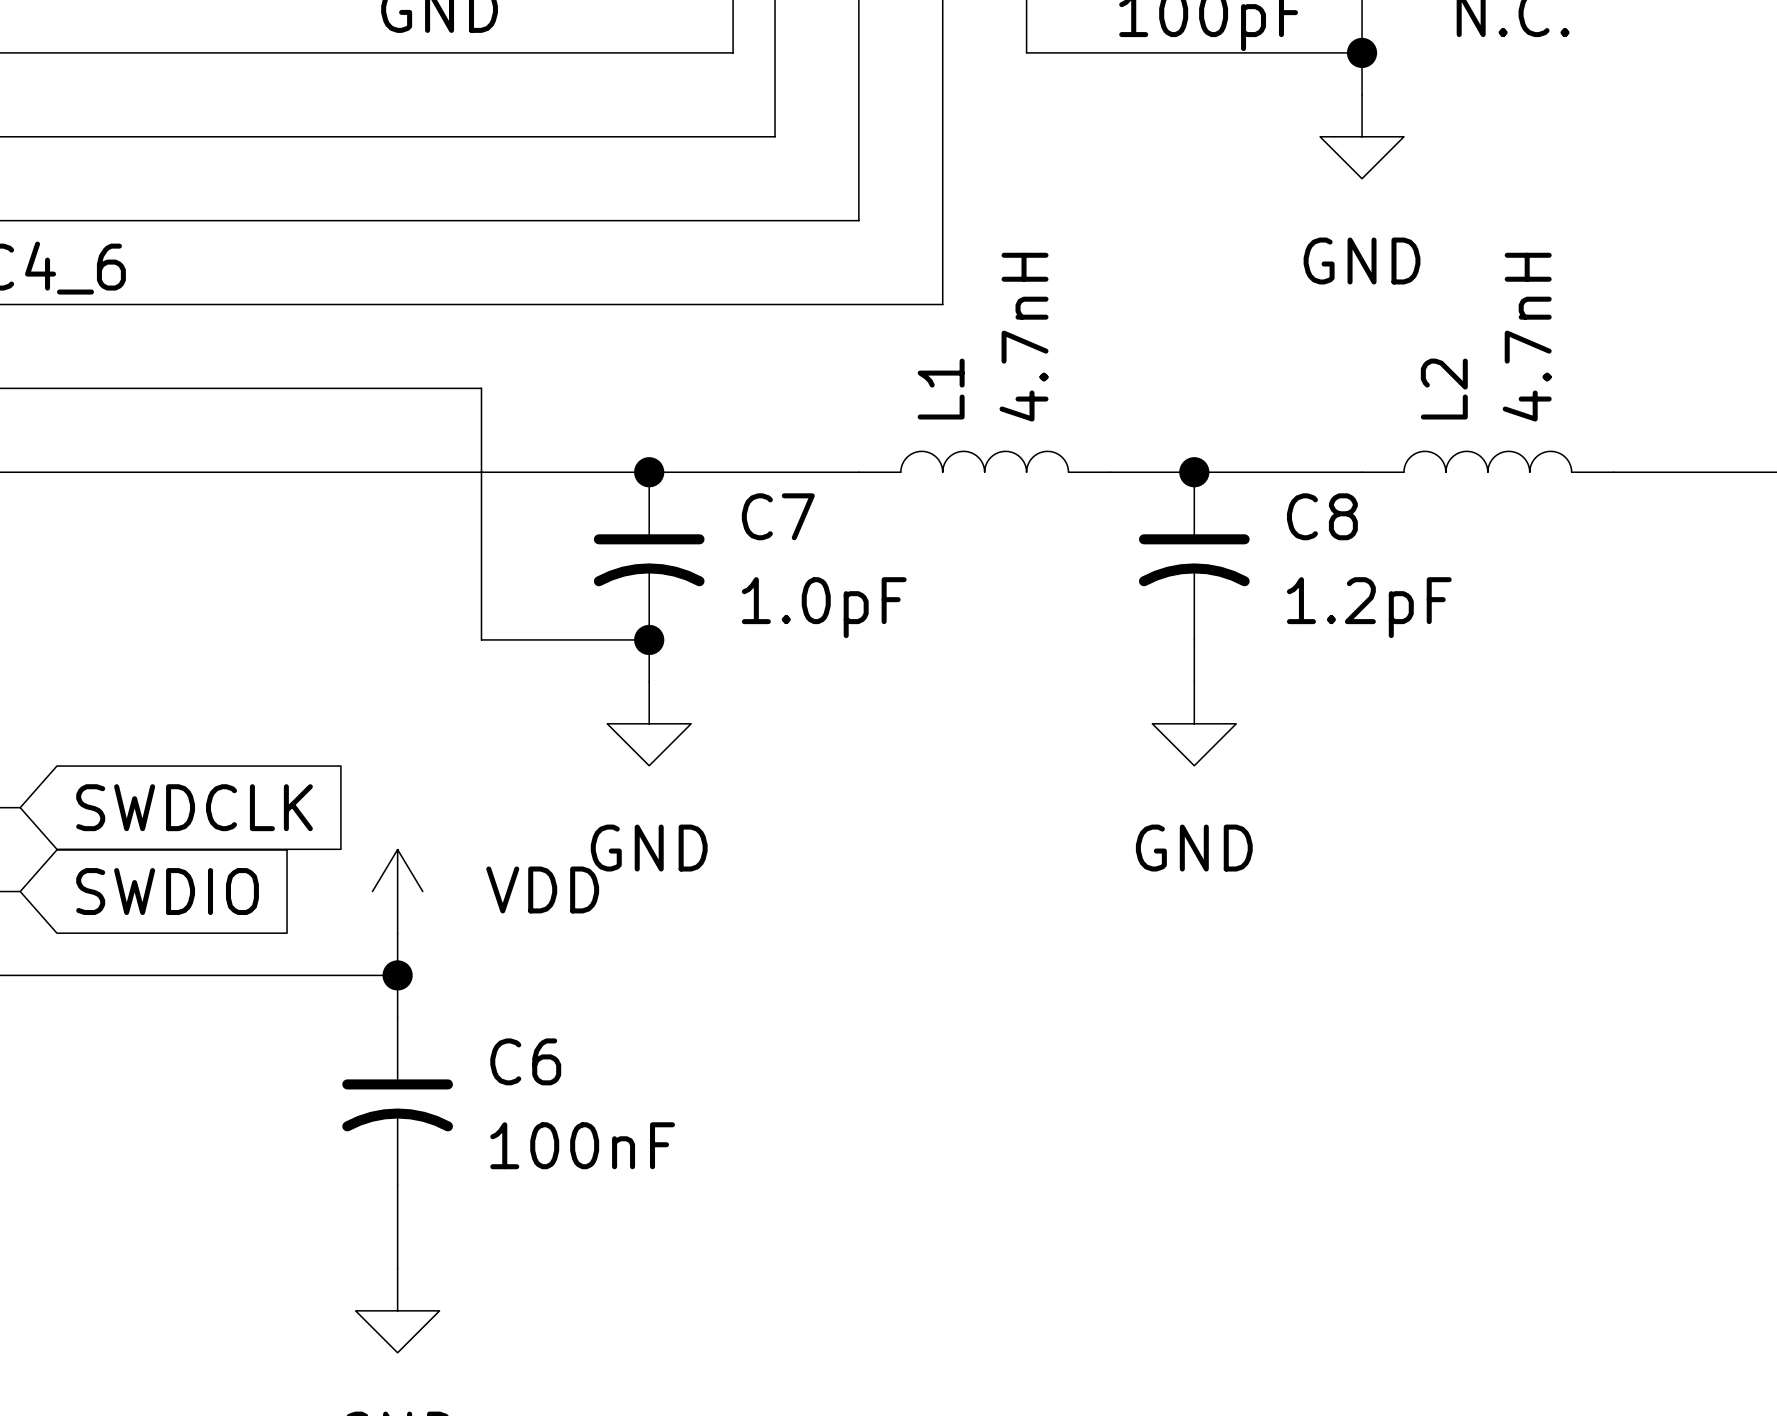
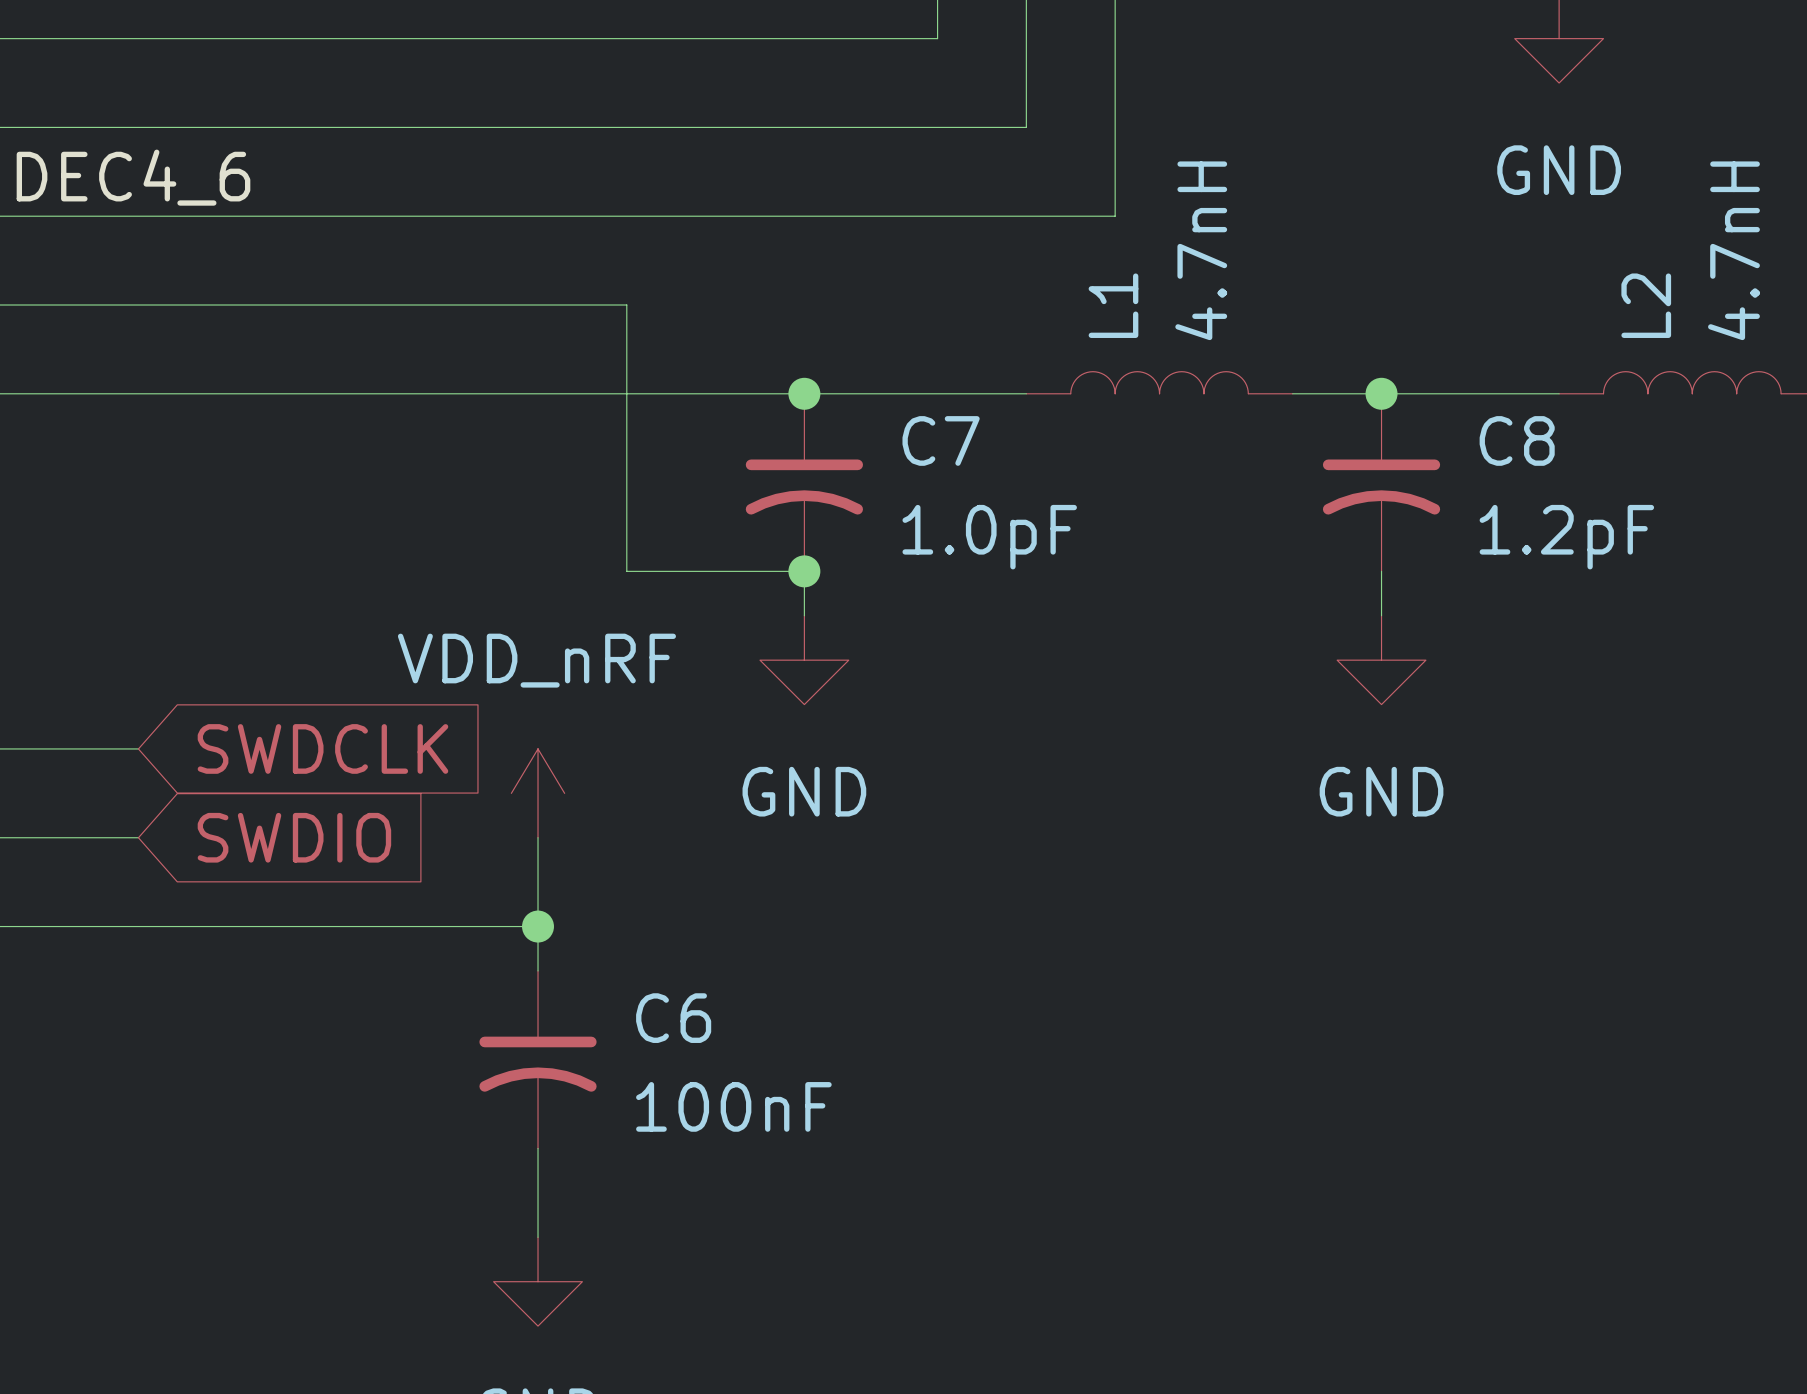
power symbol: none -> VDD_nRF (538, 793)
power symbol: VDD (397, 891) -> none

